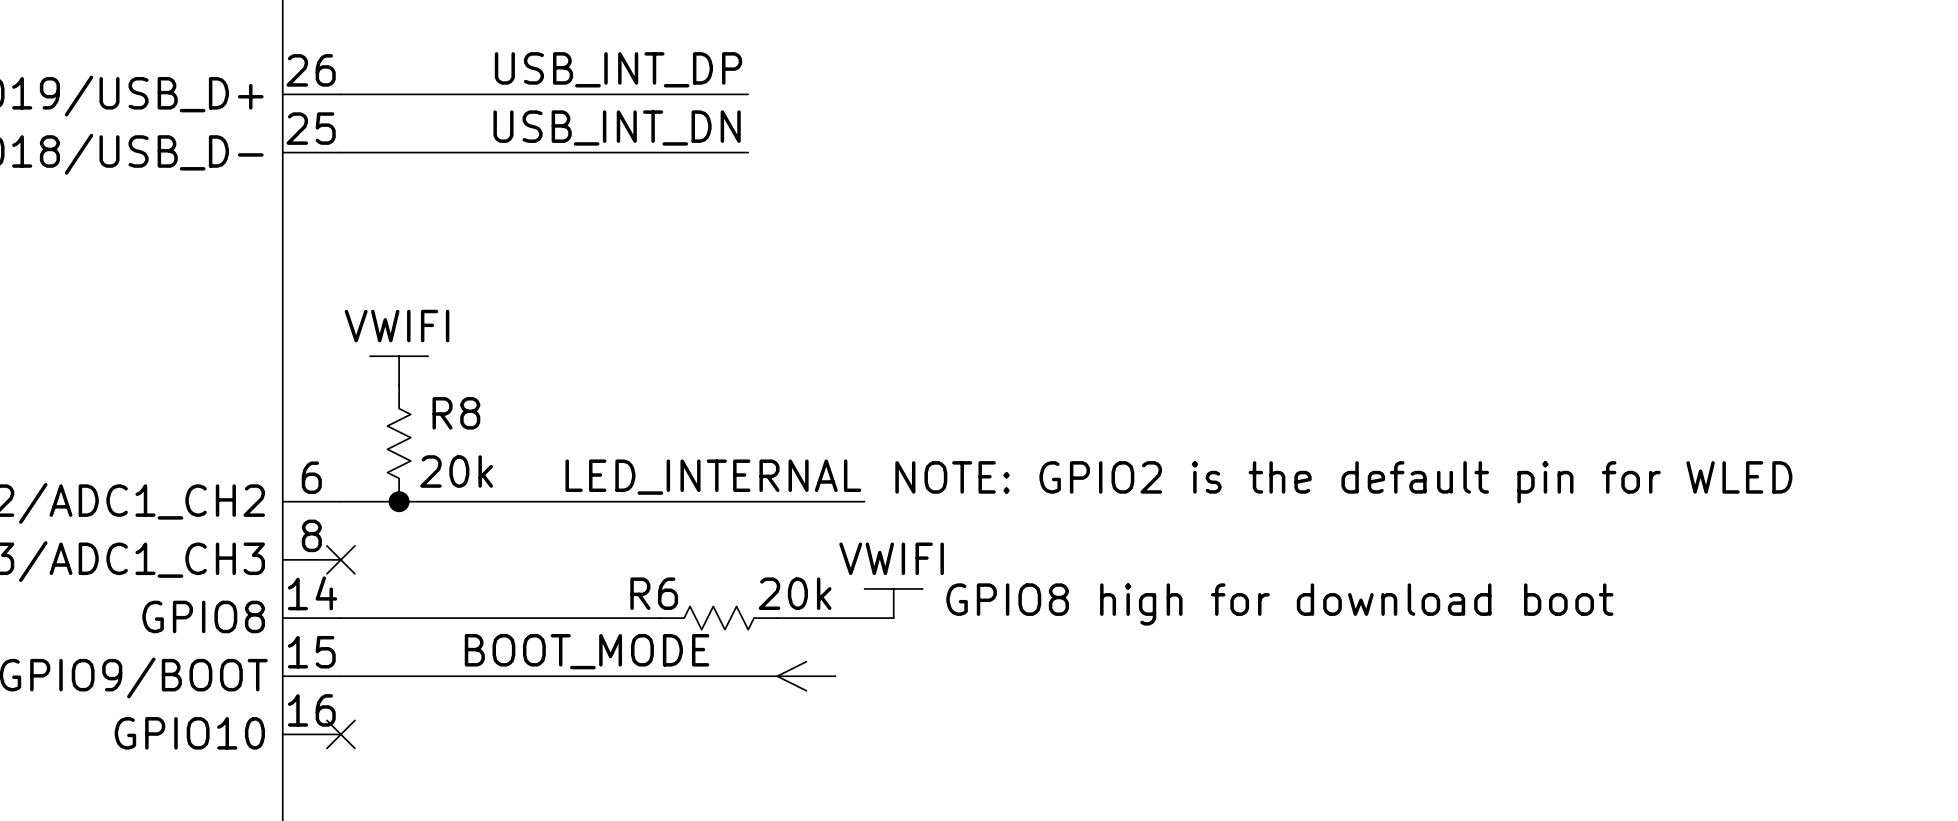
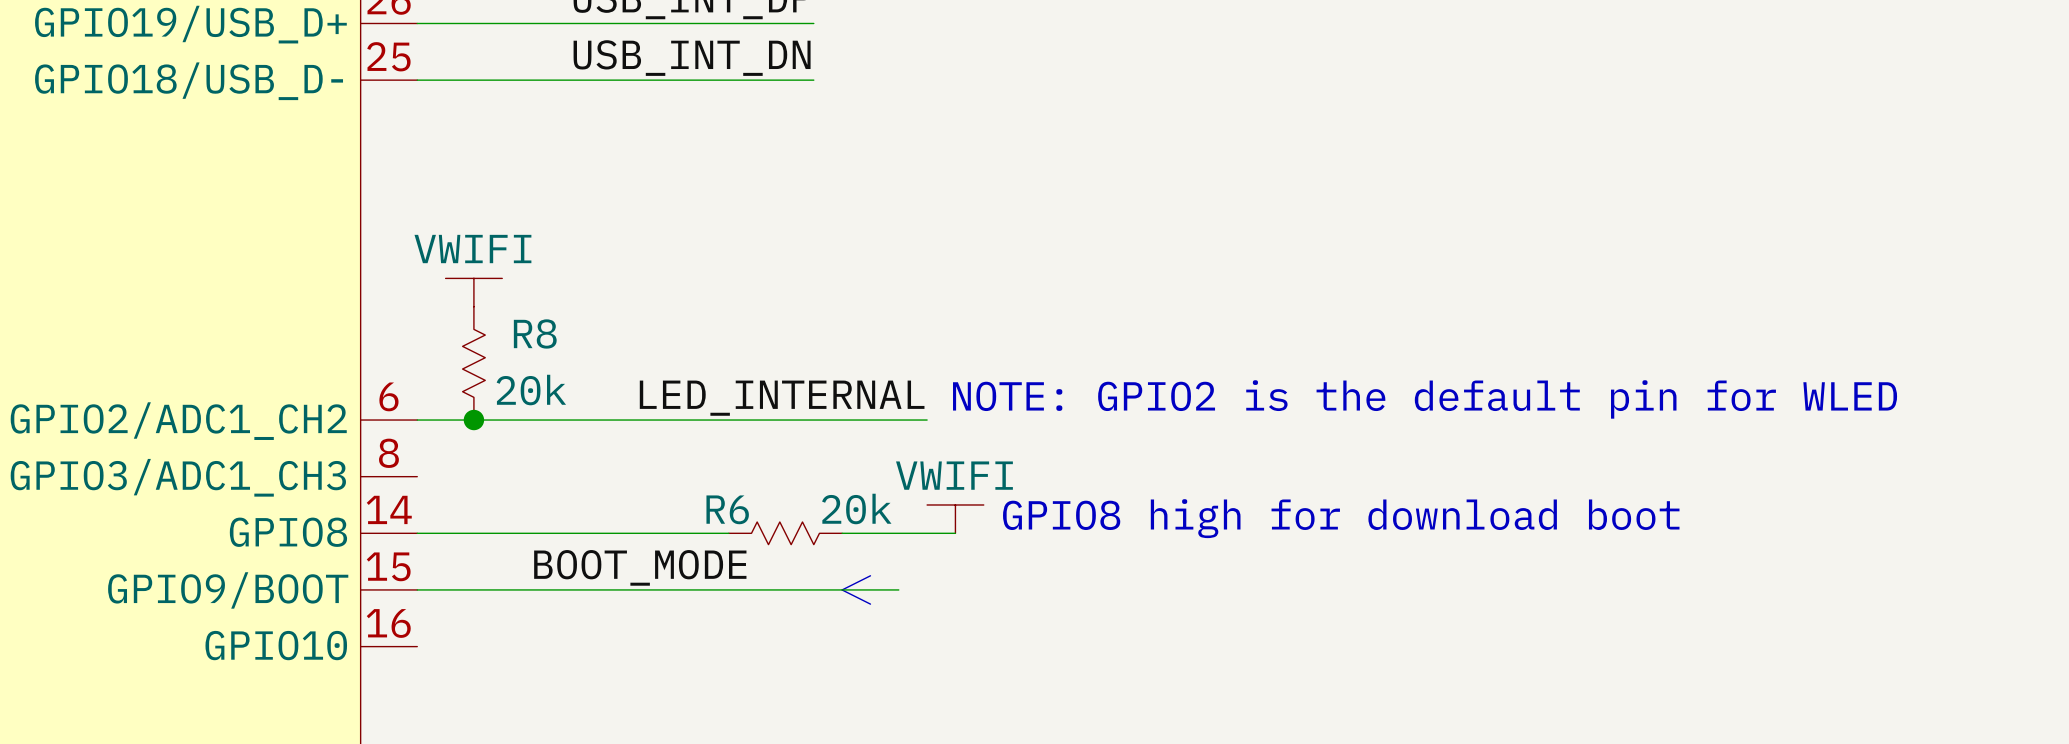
no-connect mark: (340, 559) -> none
no-connect mark: (340, 734) -> none

